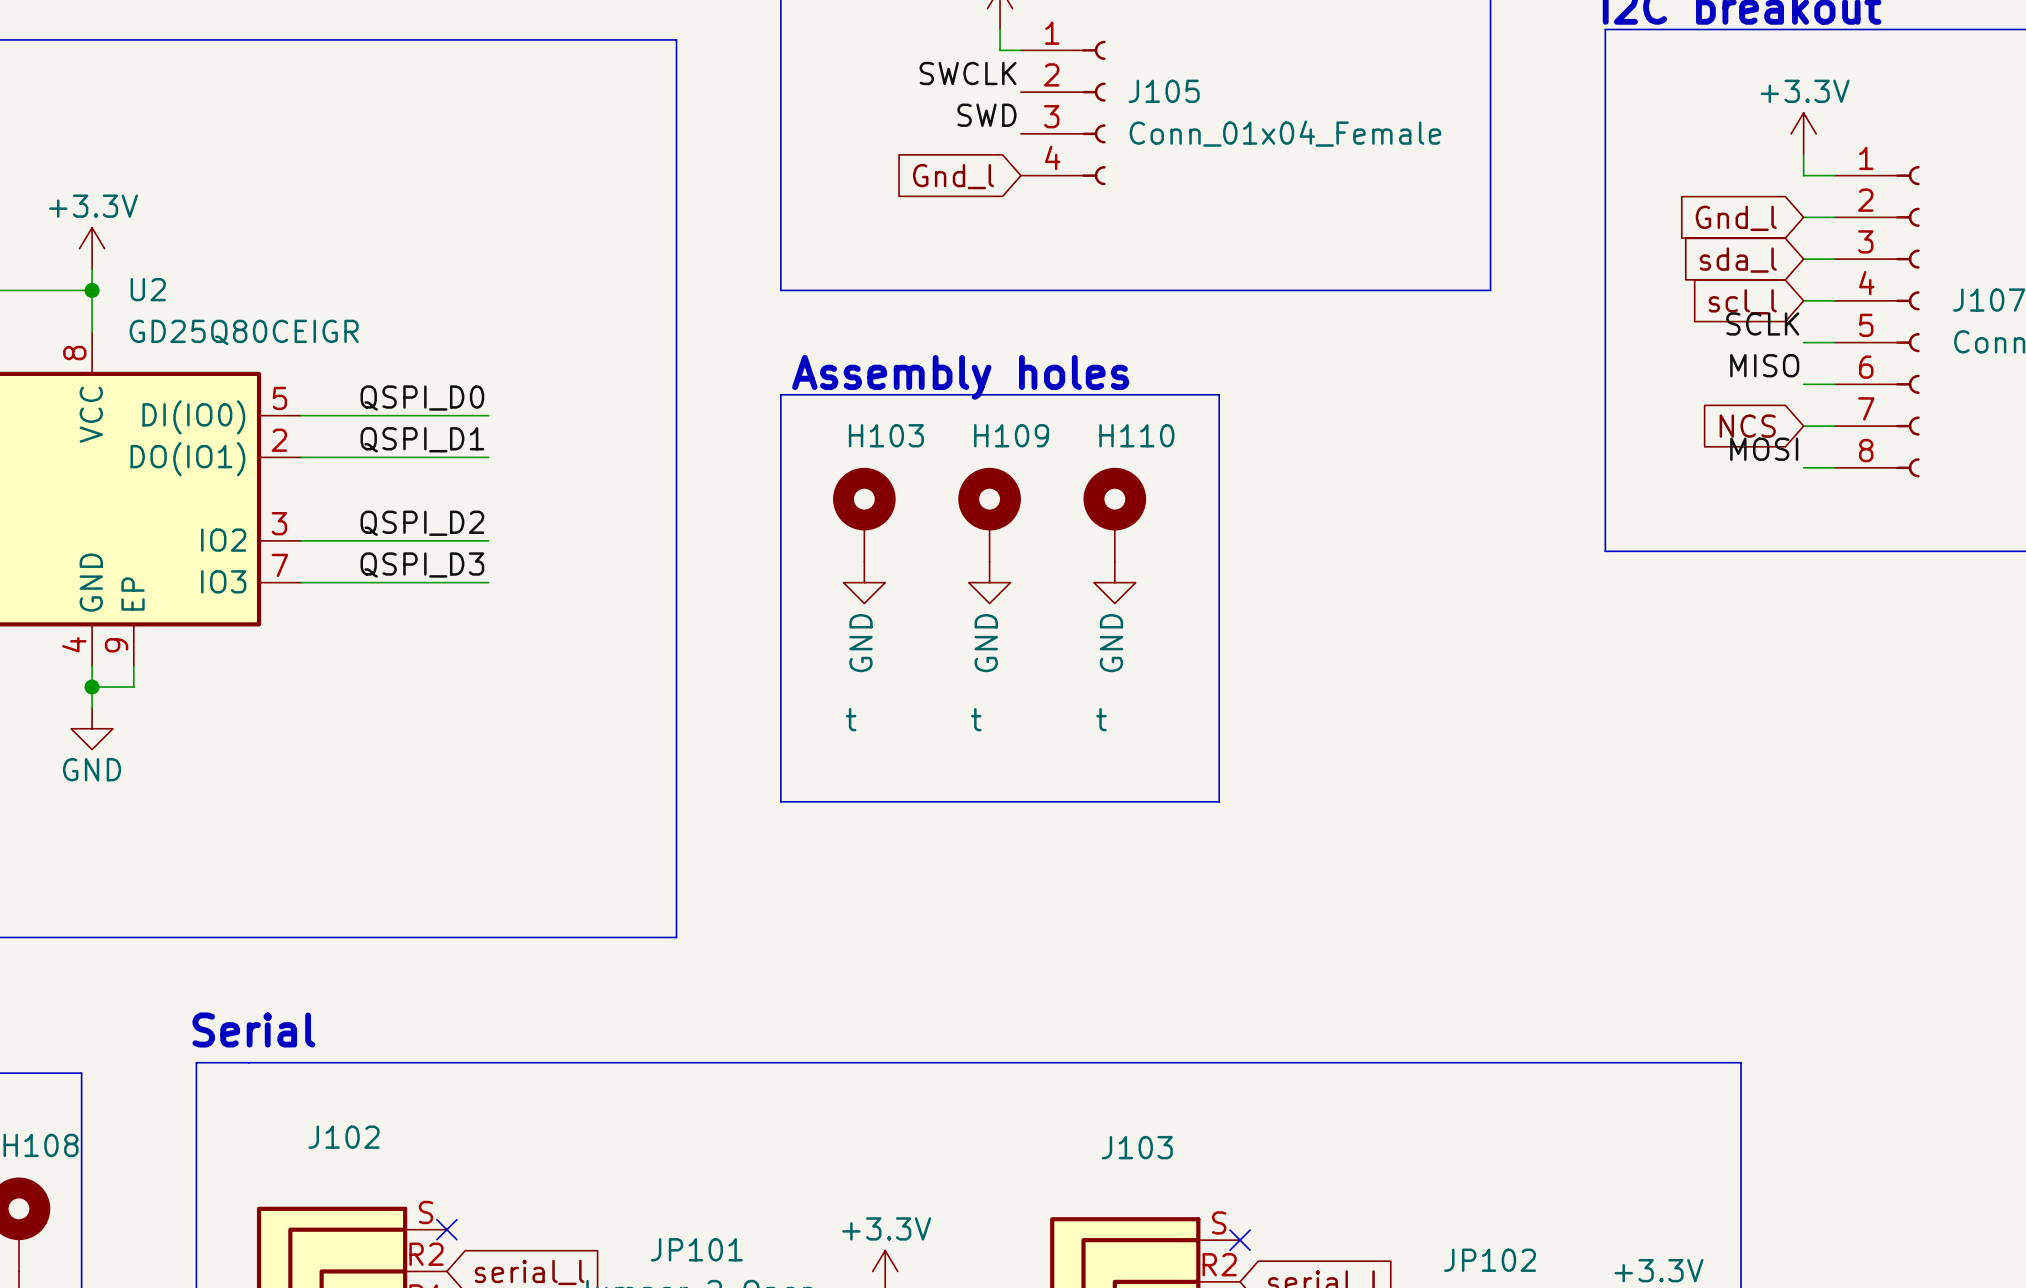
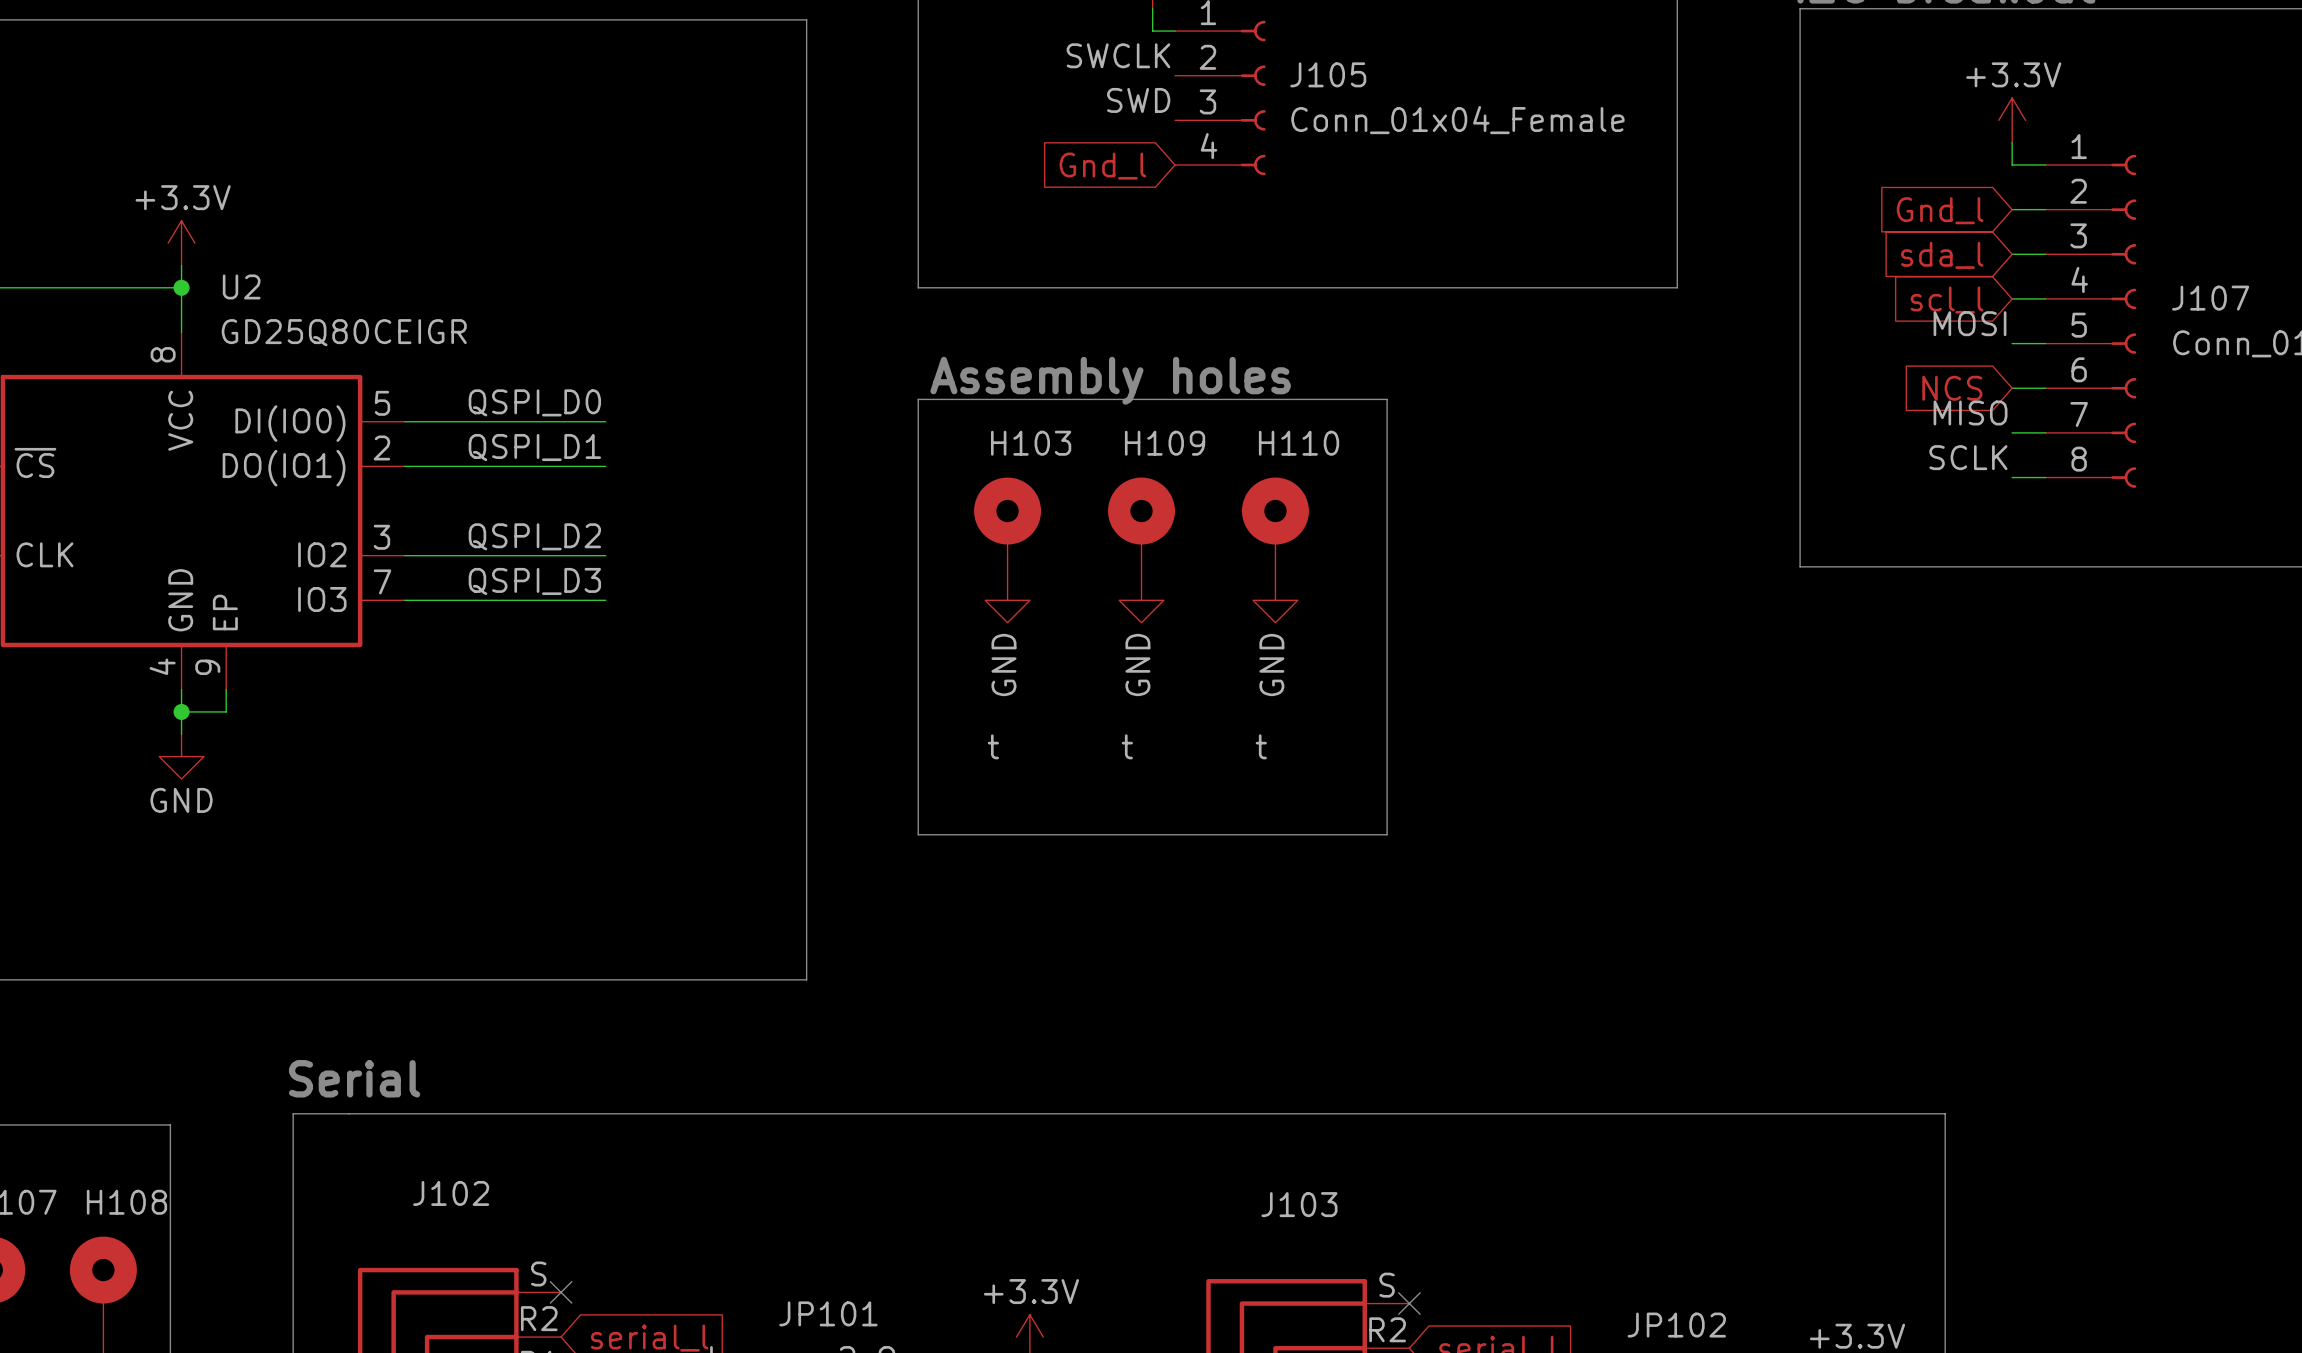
label: SCLK (1762, 323) -> MOSI (1970, 323)
label position: MISO (1764, 365) -> MISO (1970, 412)
global label position: NCS (1747, 426) -> NCS (1952, 388)
label: MOSI (1764, 449) -> SCLK (1968, 457)

